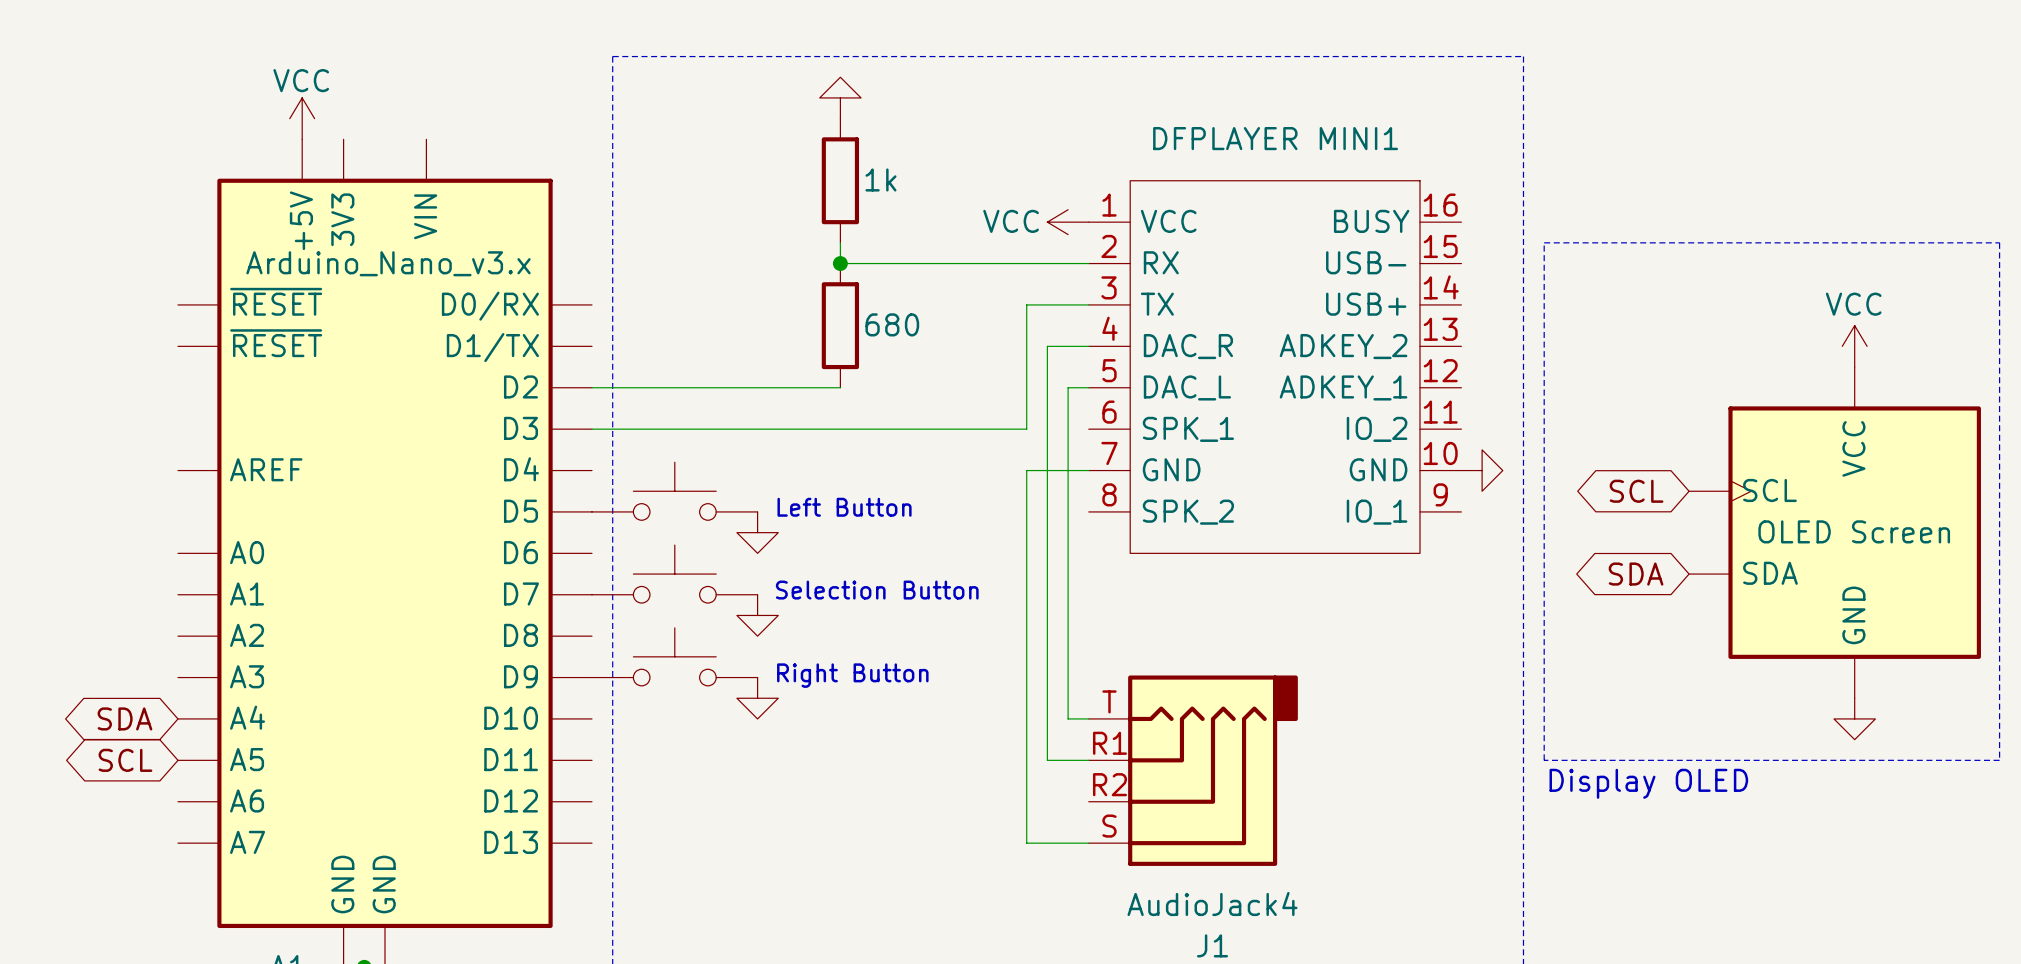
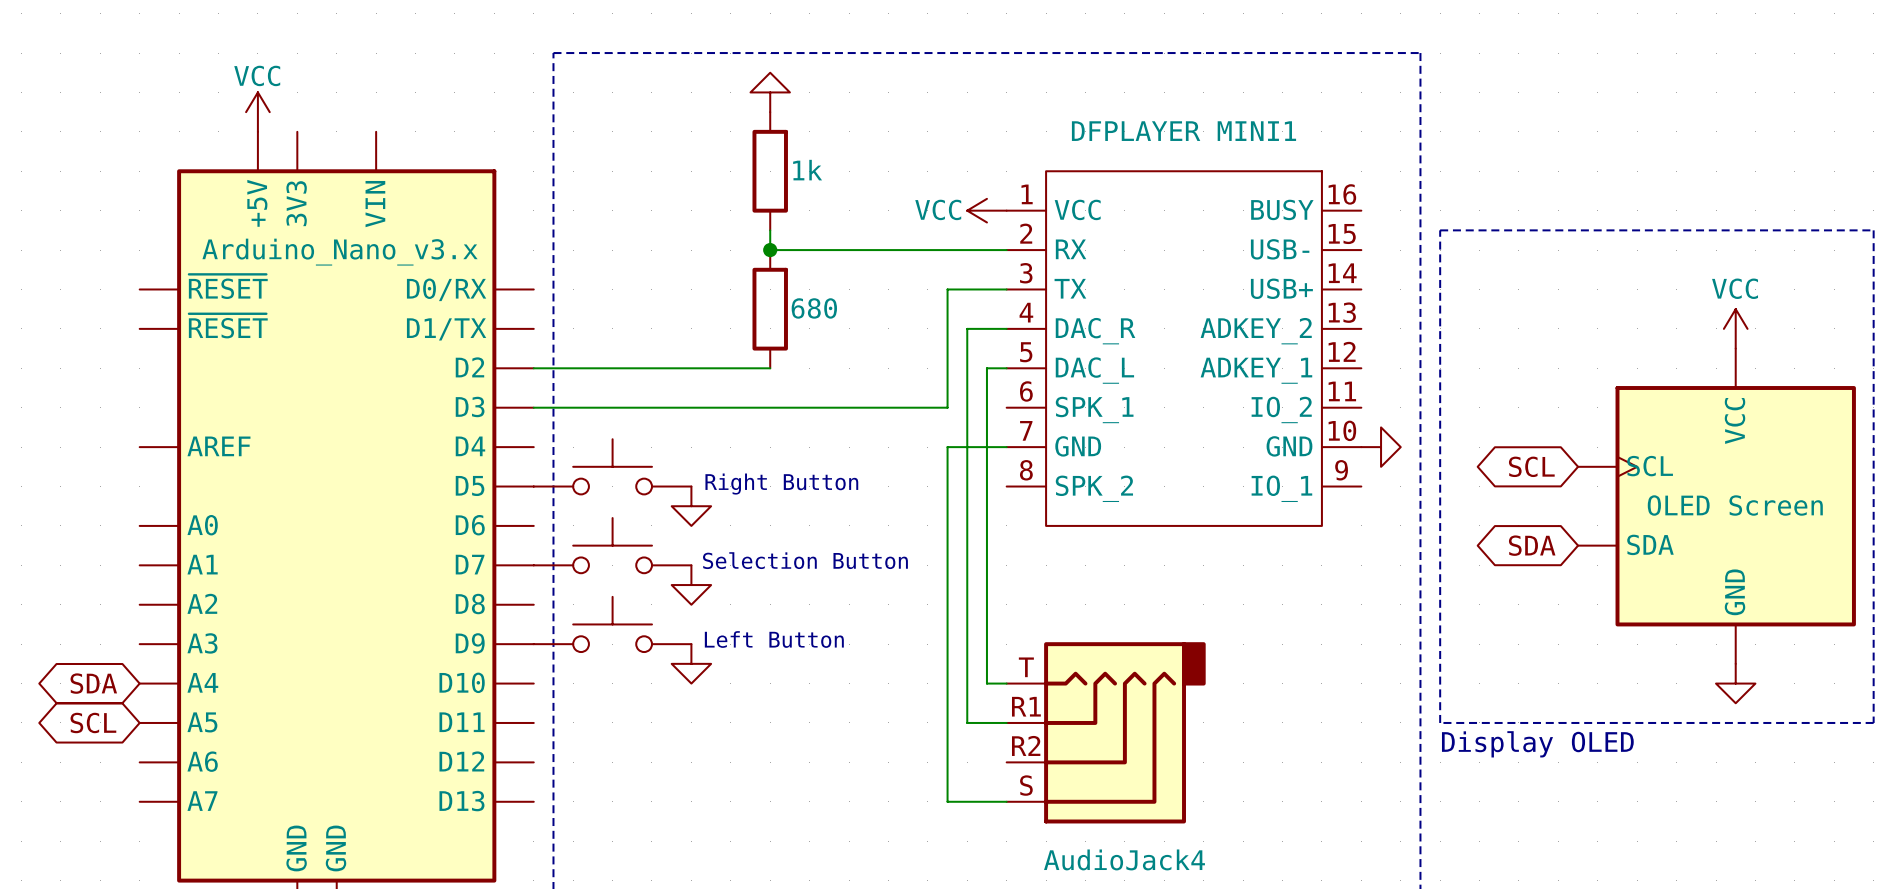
text: Left Button (844, 507) -> Right Button (781, 484)
text: Right Button (852, 675) -> Left Button (774, 639)

